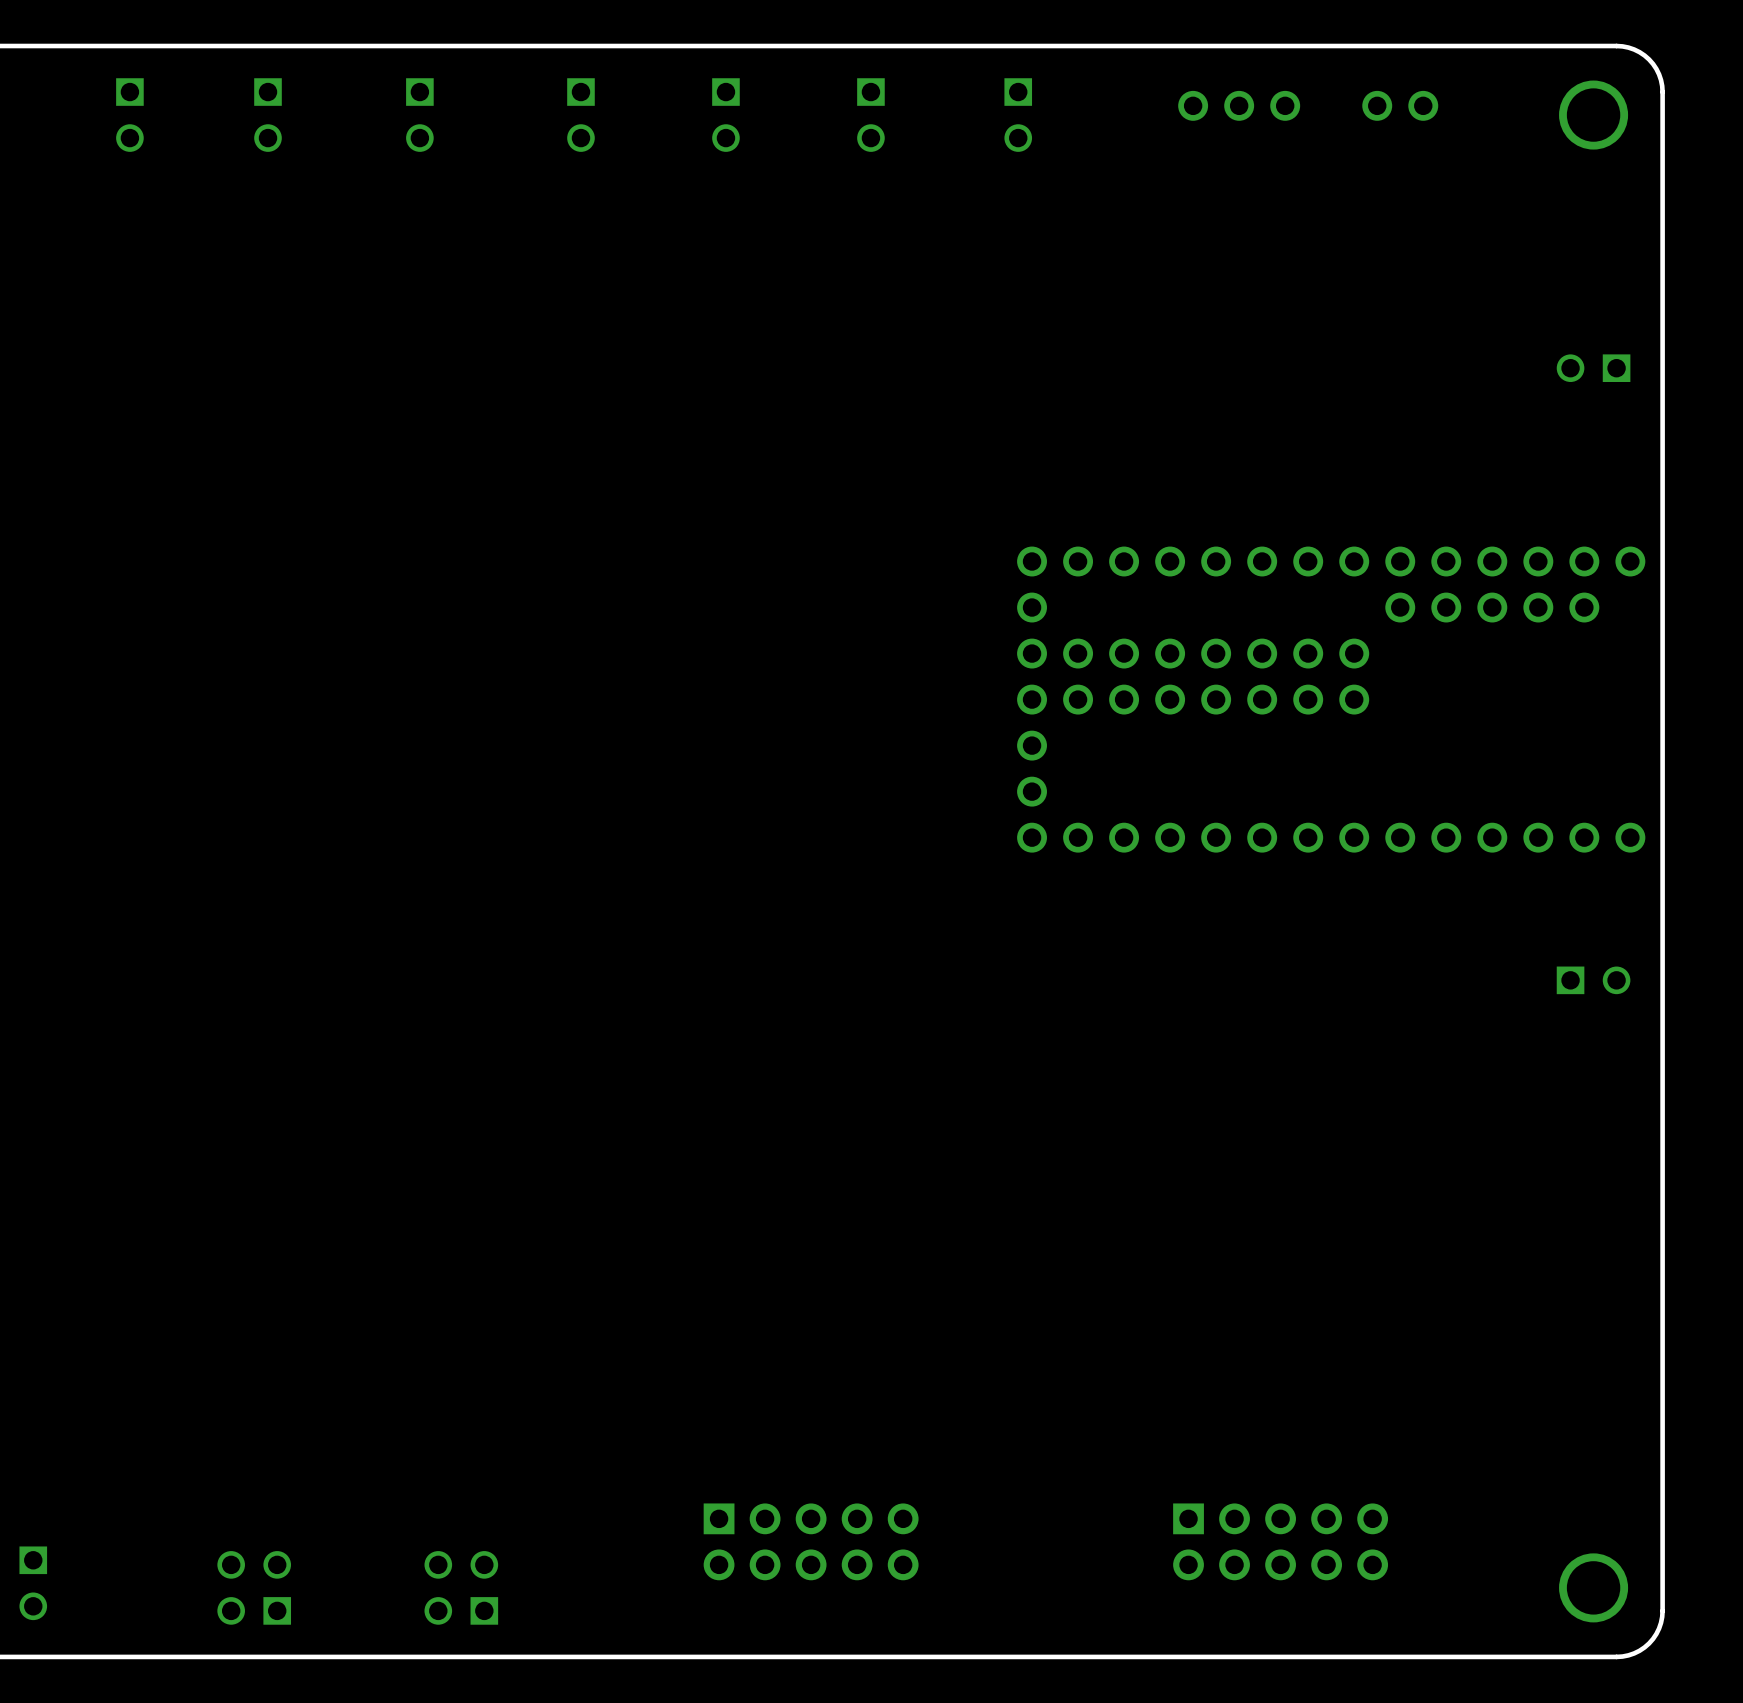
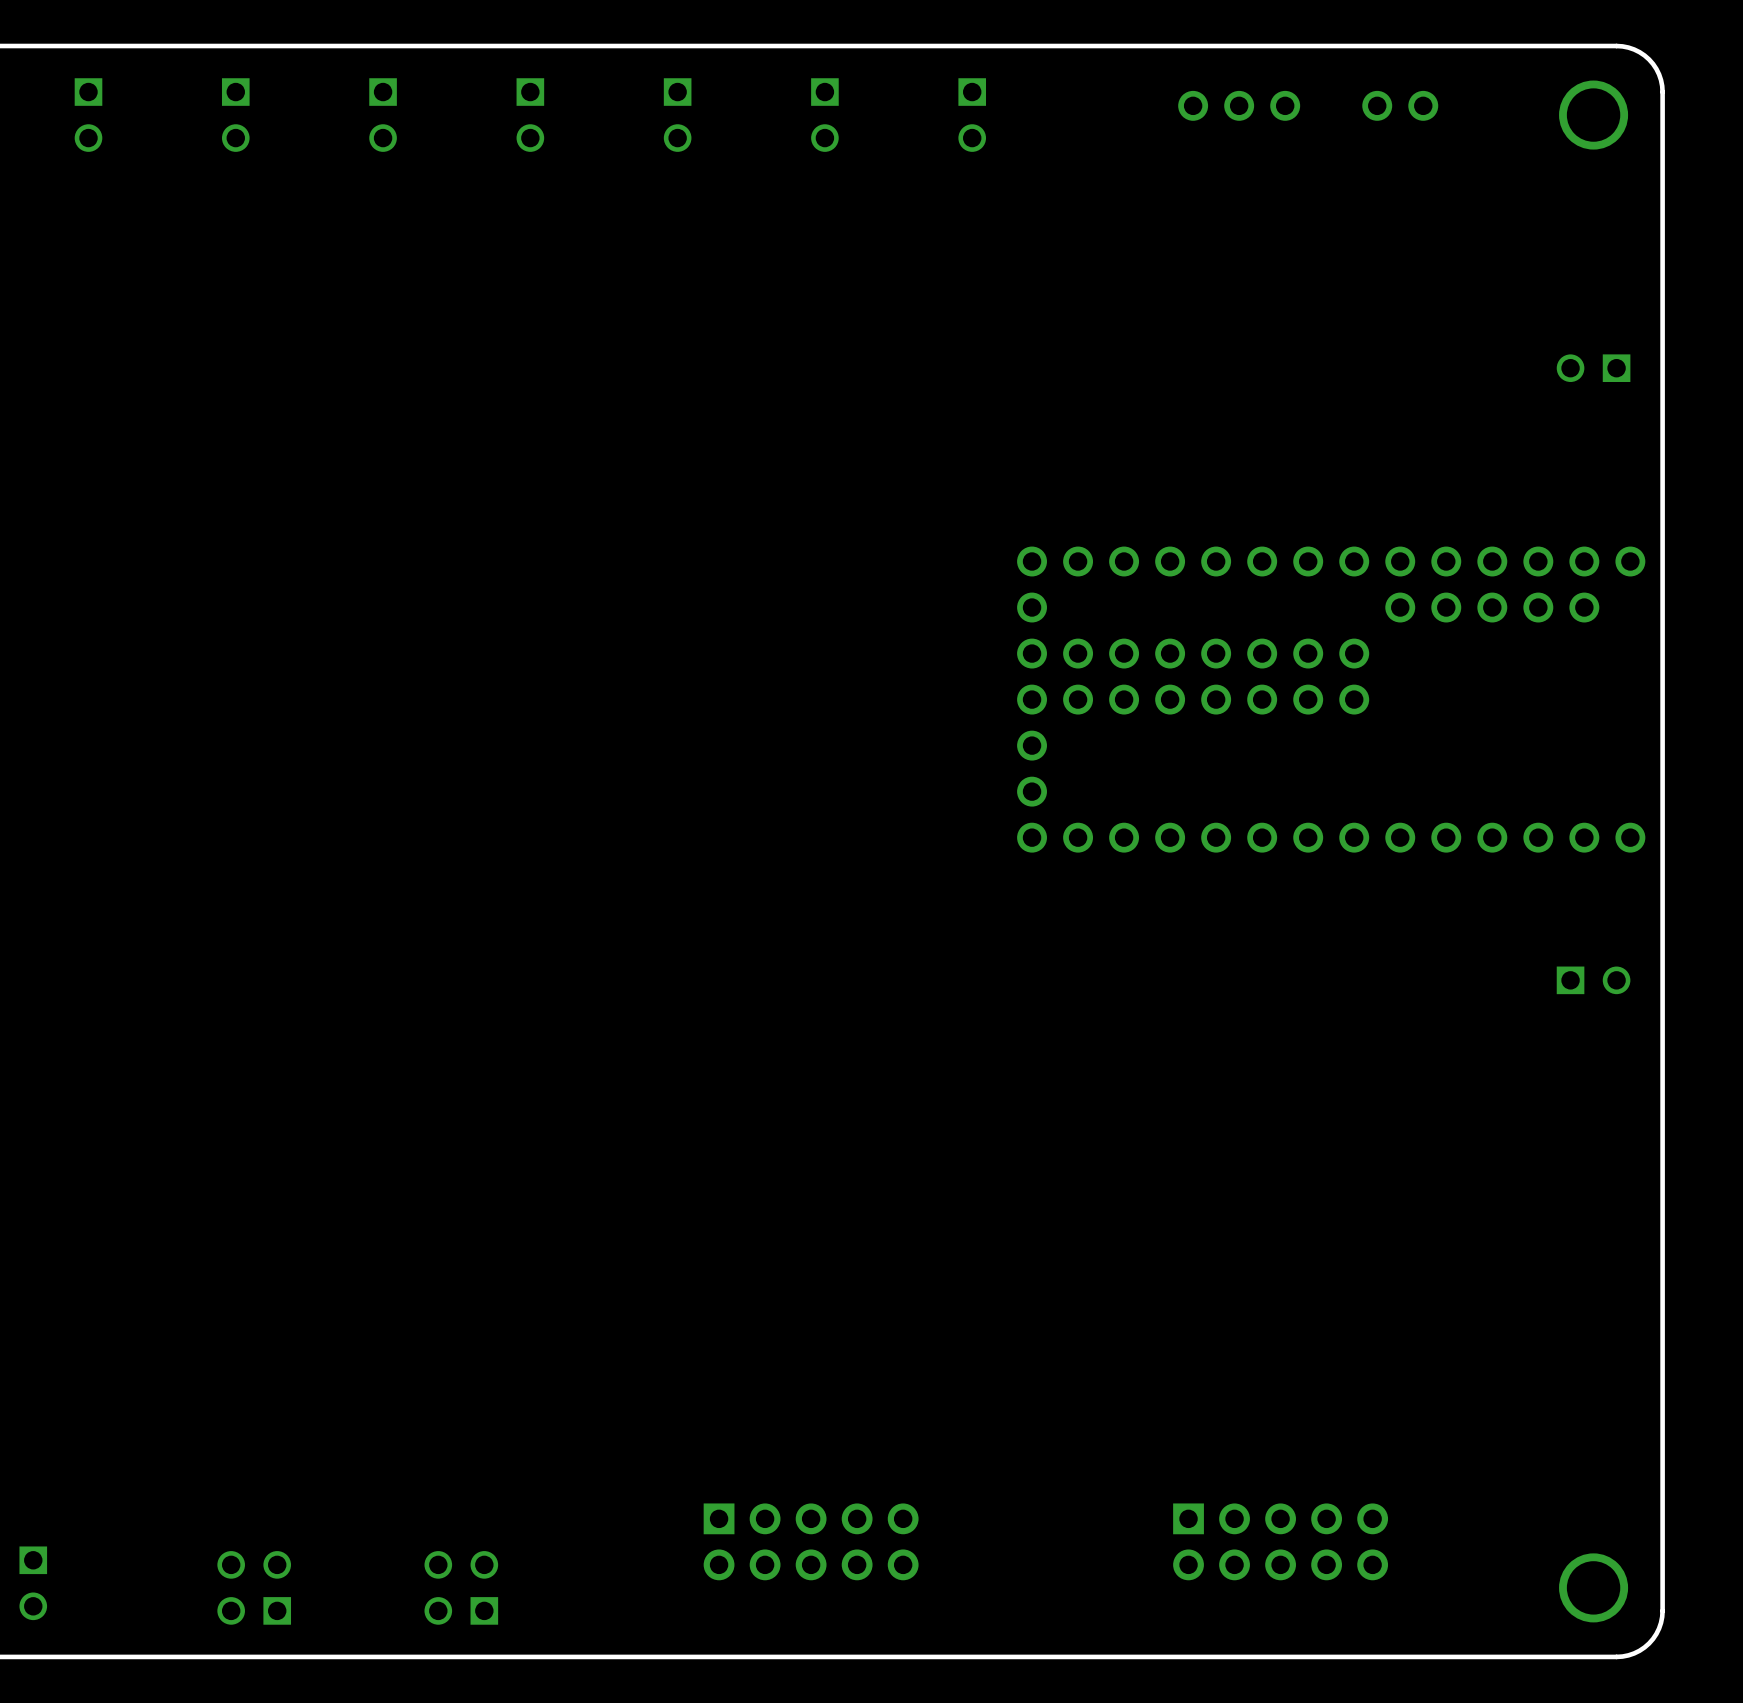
part position: (129, 115) -> (88, 115)
part position: (268, 115) -> (235, 115)
part position: (419, 115) -> (383, 115)
part: none -> (530, 115)
part: (580, 115) -> none
part: none -> (677, 115)
part: (725, 115) -> none
part position: (870, 115) -> (824, 115)
part position: (1018, 115) -> (972, 115)

